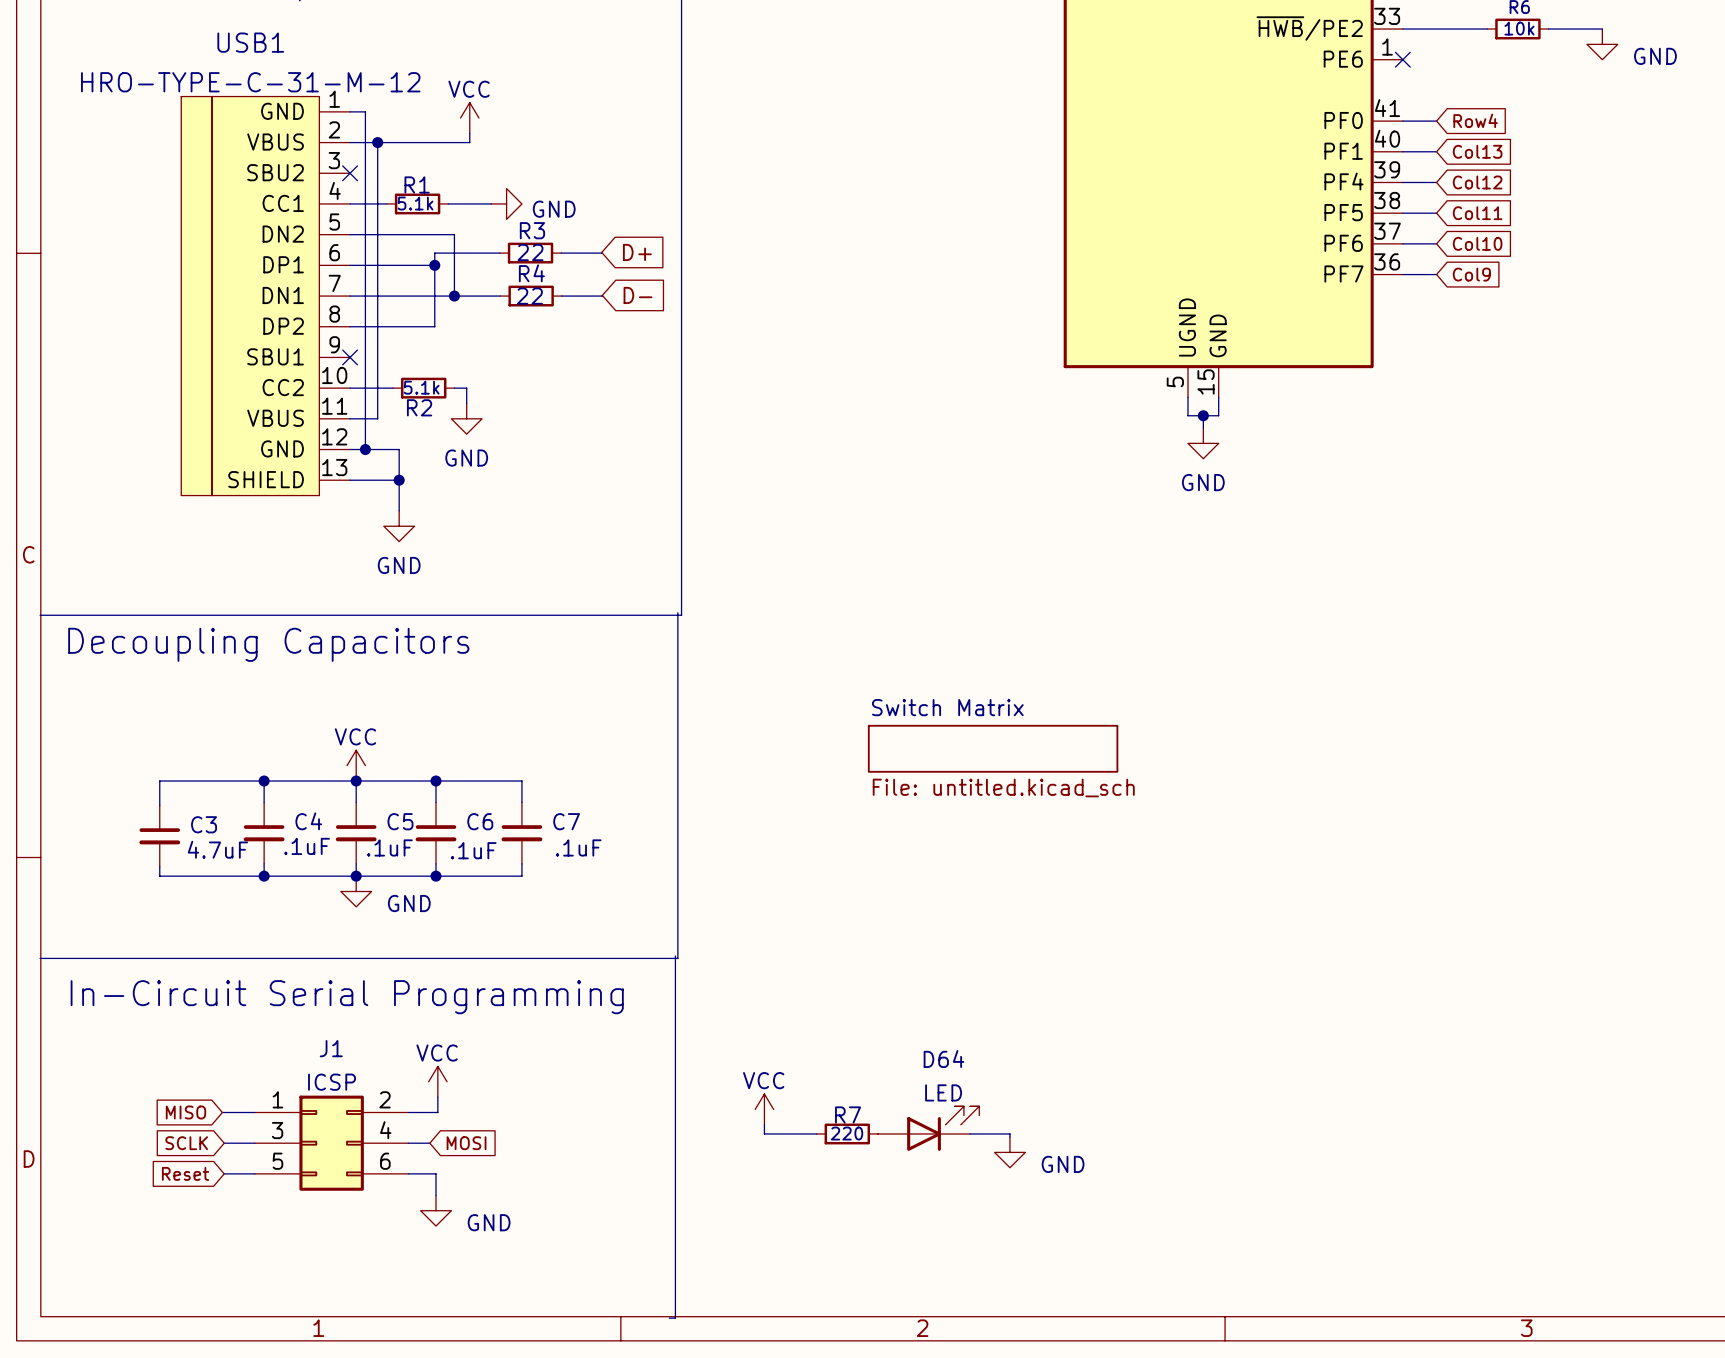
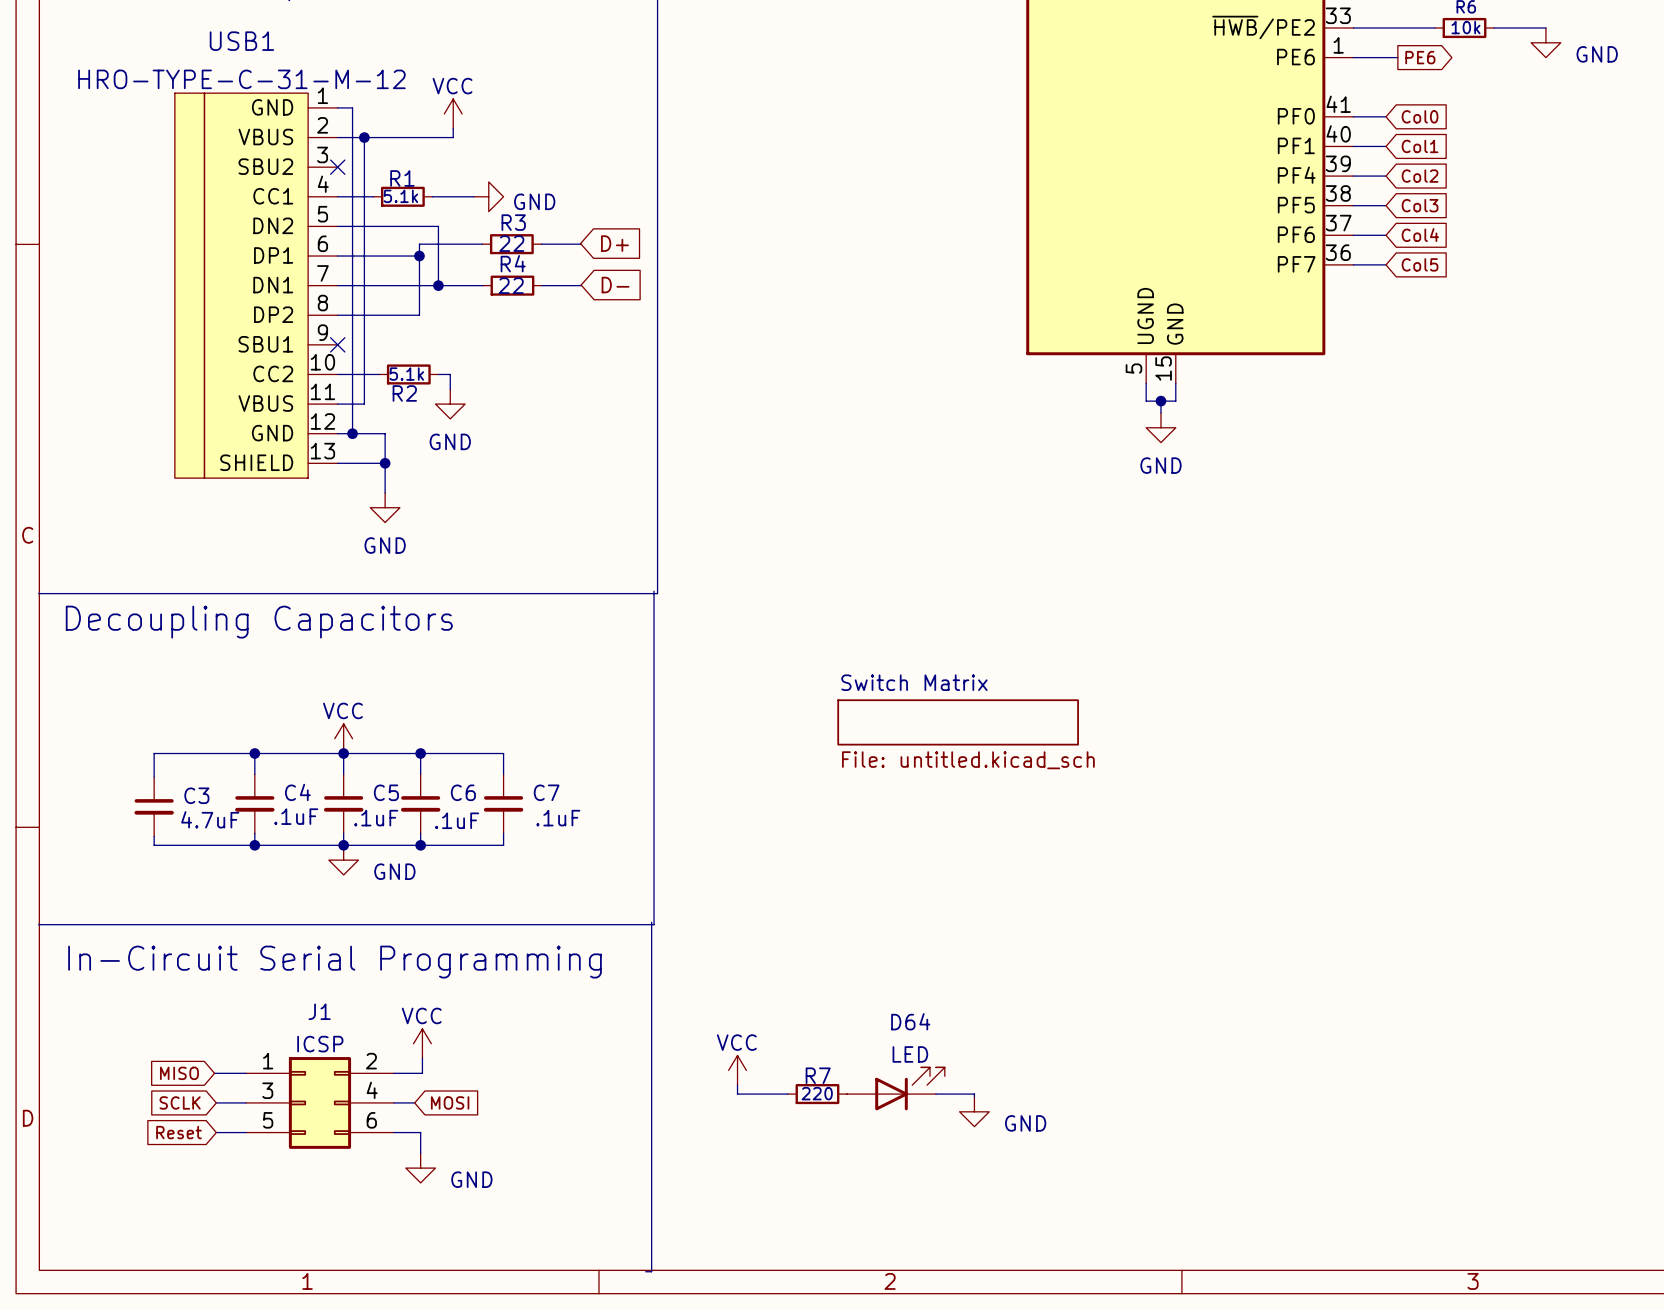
wire: none -> (1353, 57) (1397, 57)
no-connect mark: (1402, 59) -> none
global label: none -> PE6 (1420, 57)
global label: Row4 (1475, 120) -> Col0 (1420, 116)
global label: Col13 (1477, 151) -> Col1 (1420, 146)
global label: Col12 (1477, 182) -> Col2 (1420, 176)
global label: Col11 (1477, 213) -> Col3 (1420, 205)
global label: Col10 (1477, 243) -> Col4 (1420, 235)
global label: Col9 (1471, 274) -> Col5 (1420, 264)

